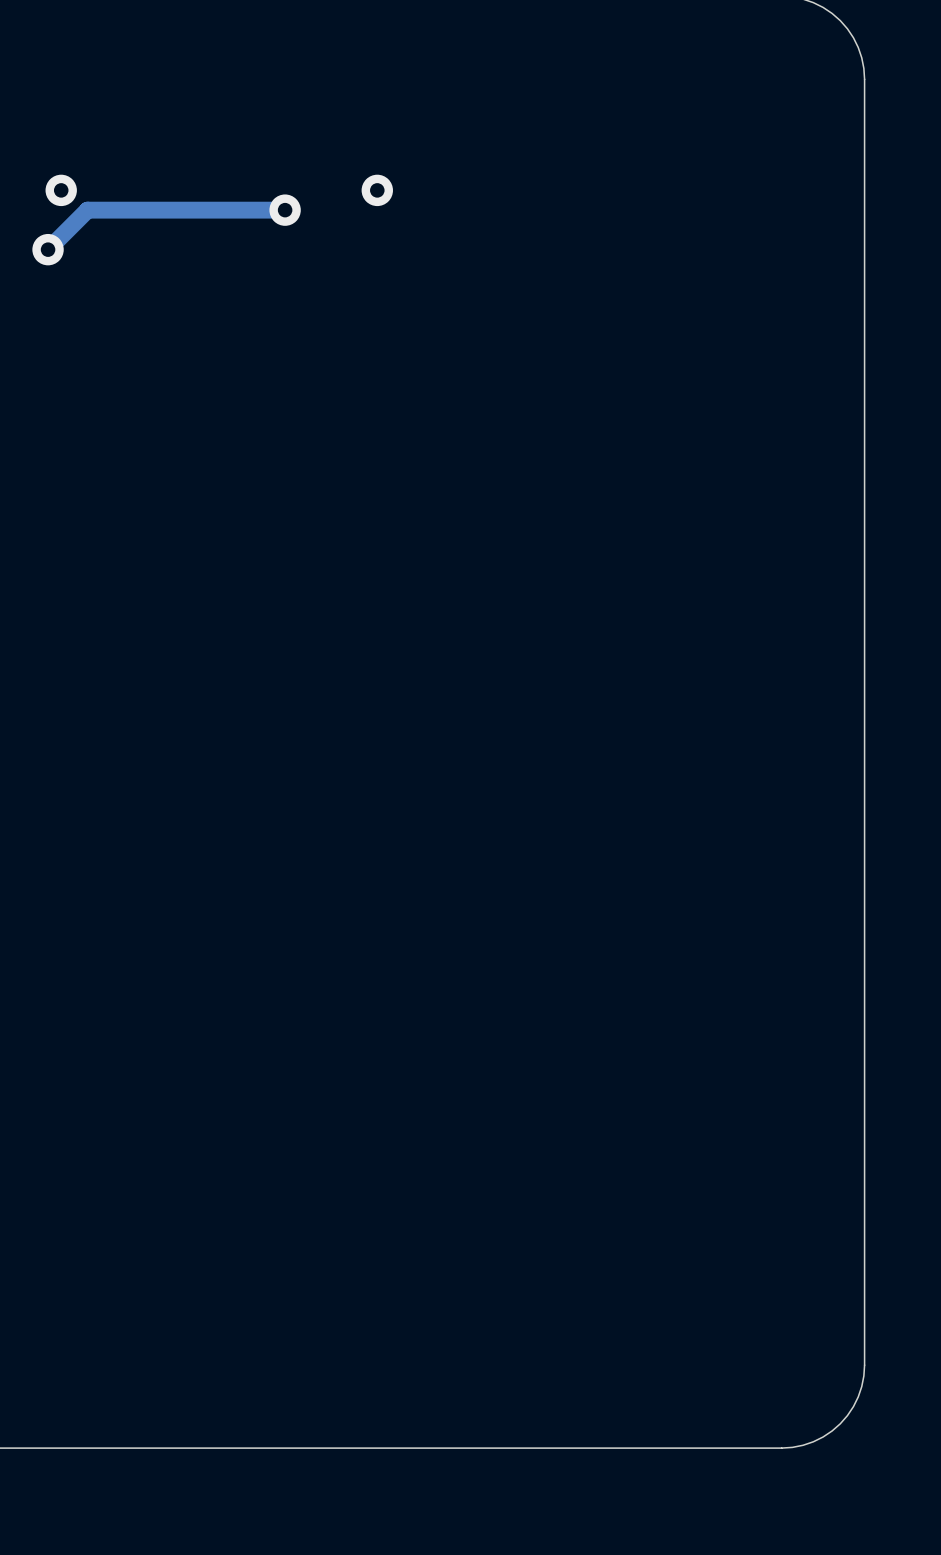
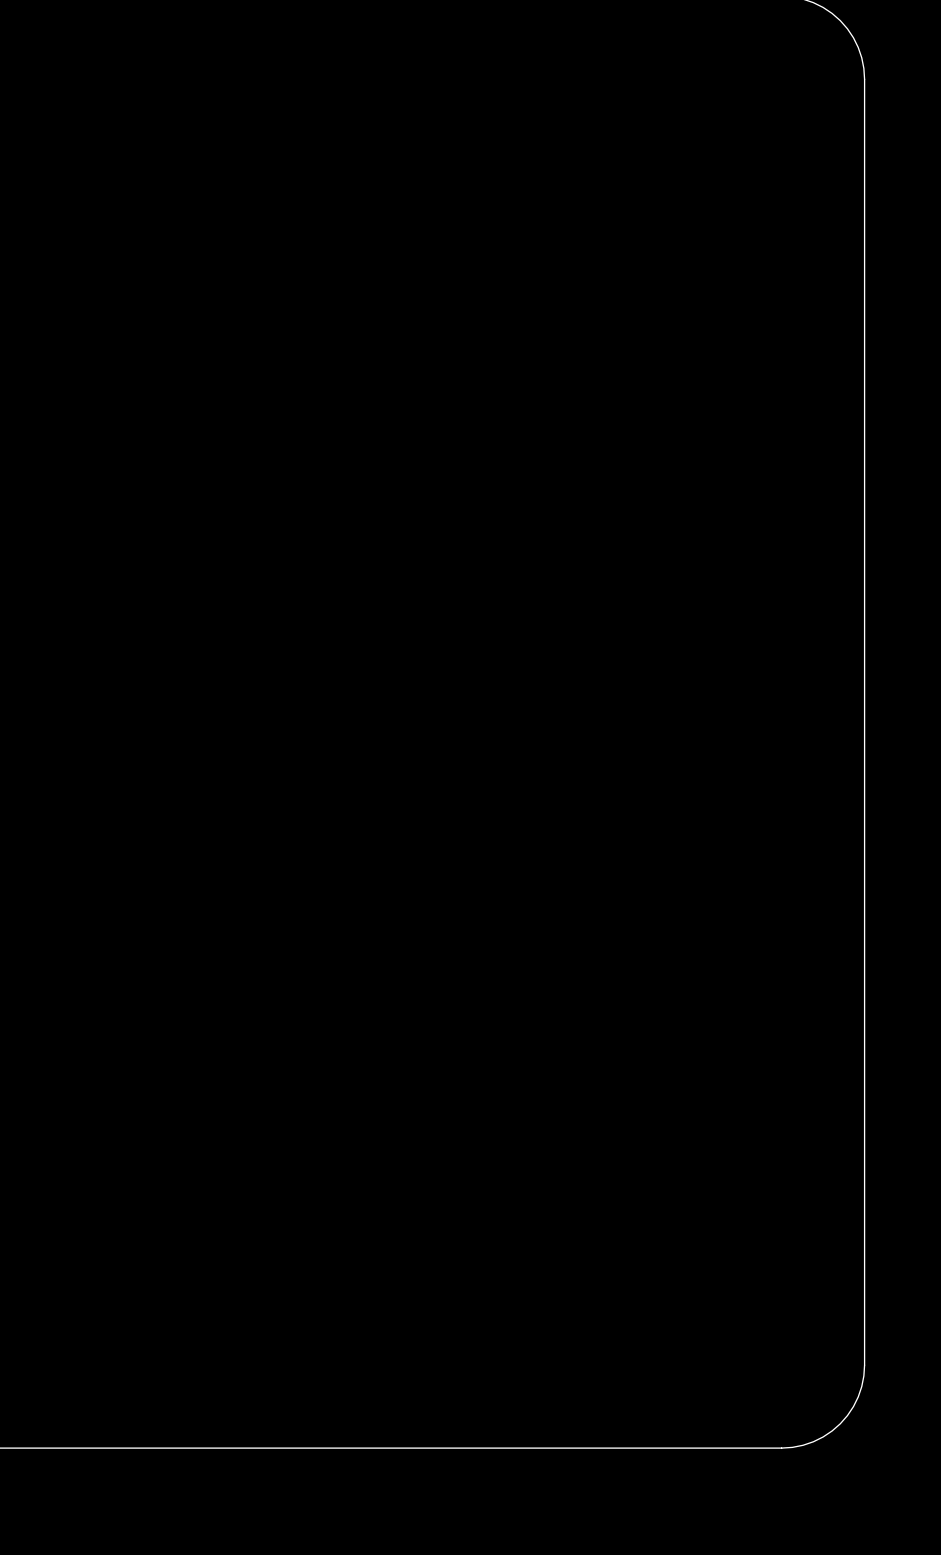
via: (61, 190) -> none
via: (377, 190) -> none
track: (285, 210) (87, 210) (48, 249) -> none
via: (285, 210) -> none
via: (48, 249) -> none

